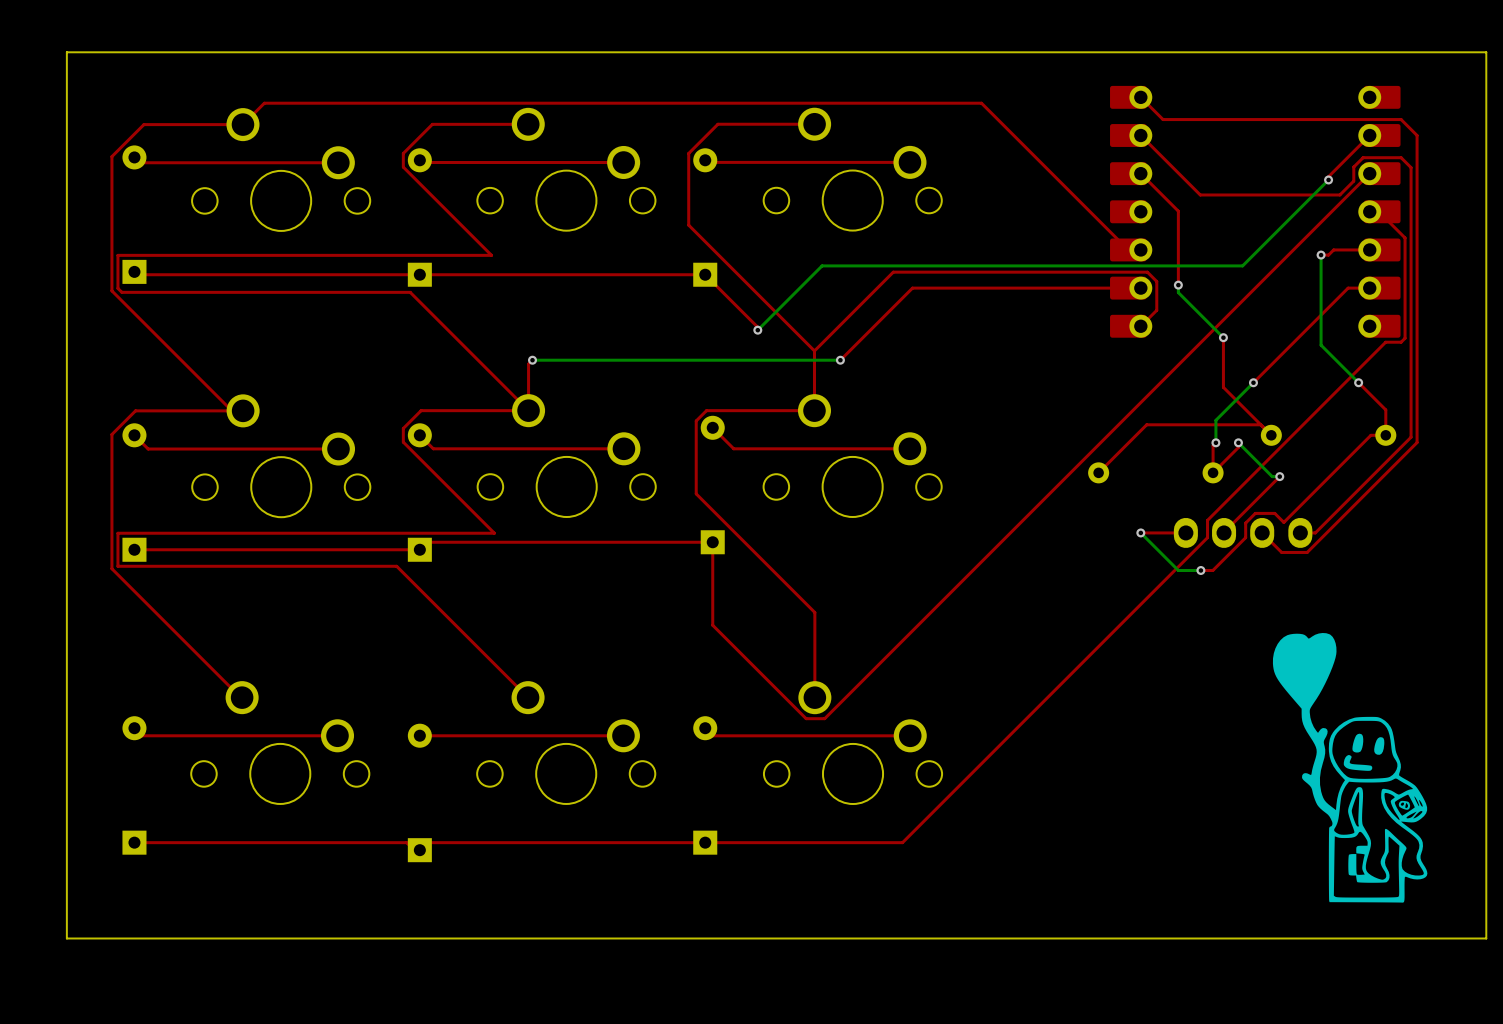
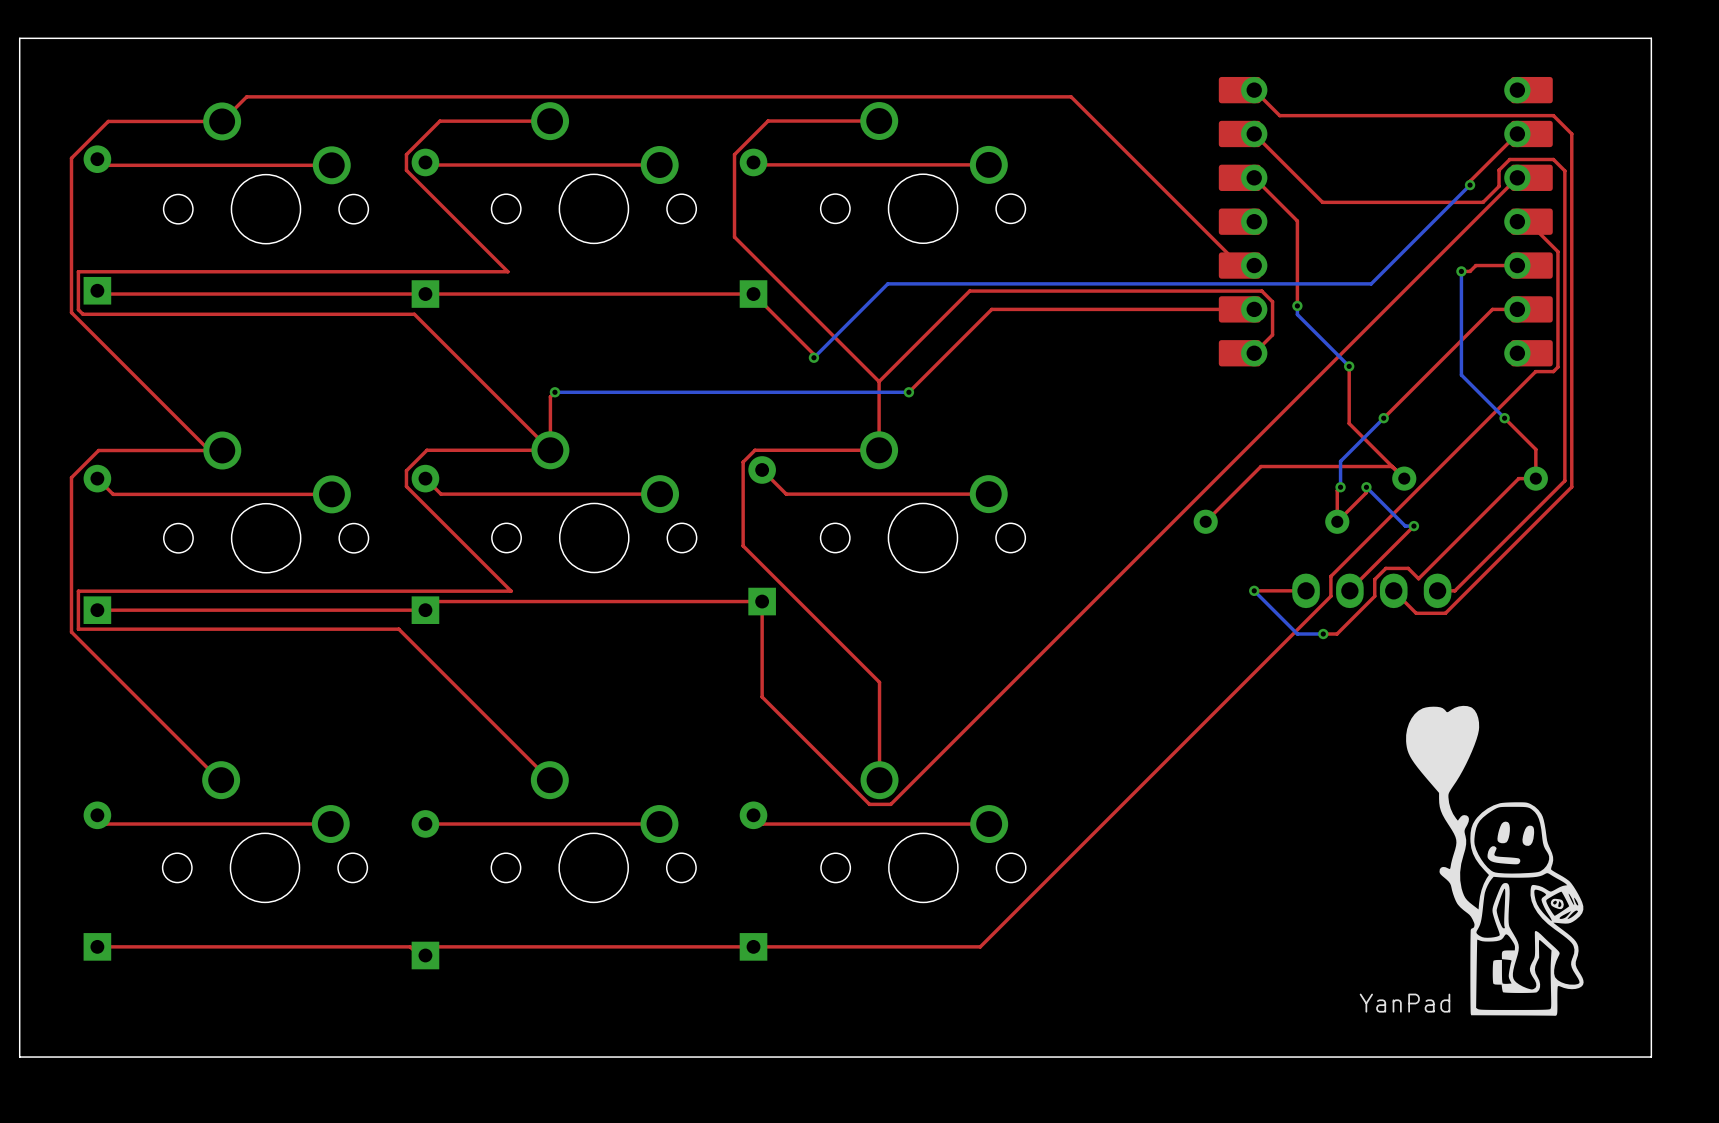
text: none -> YanPad (1405, 1003)

